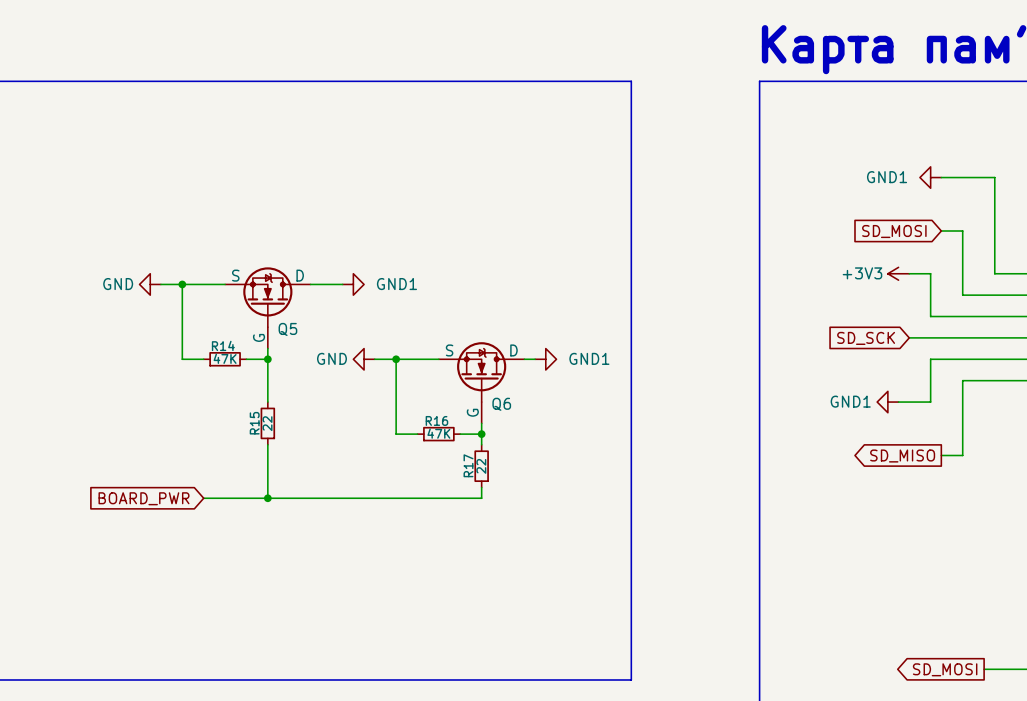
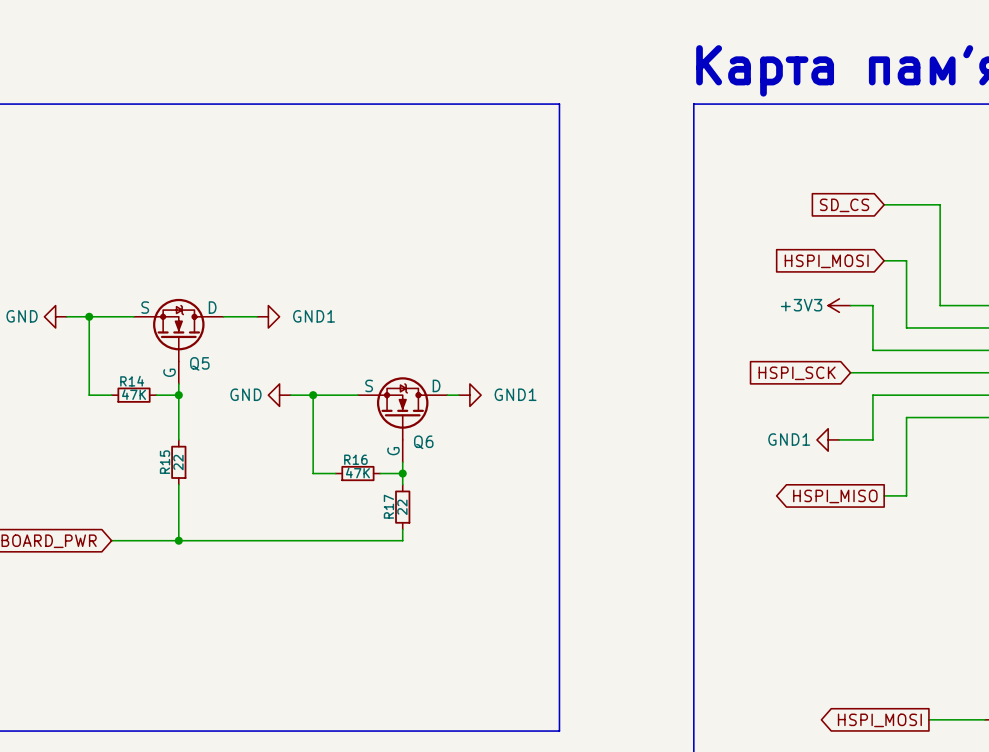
power symbol: GND1 (930, 177) -> none
global label: none -> SD_CS (844, 205)
global label: SD_MOSI (894, 231) -> HSPI_MOSI (826, 261)
global label: SD_SCK (866, 338) -> HSPI_SCK (797, 373)
global label: SD_MISO (902, 456) -> HSPI_MISO (835, 496)
global label: SD_MOSI (945, 669) -> HSPI_MOSI (879, 720)

